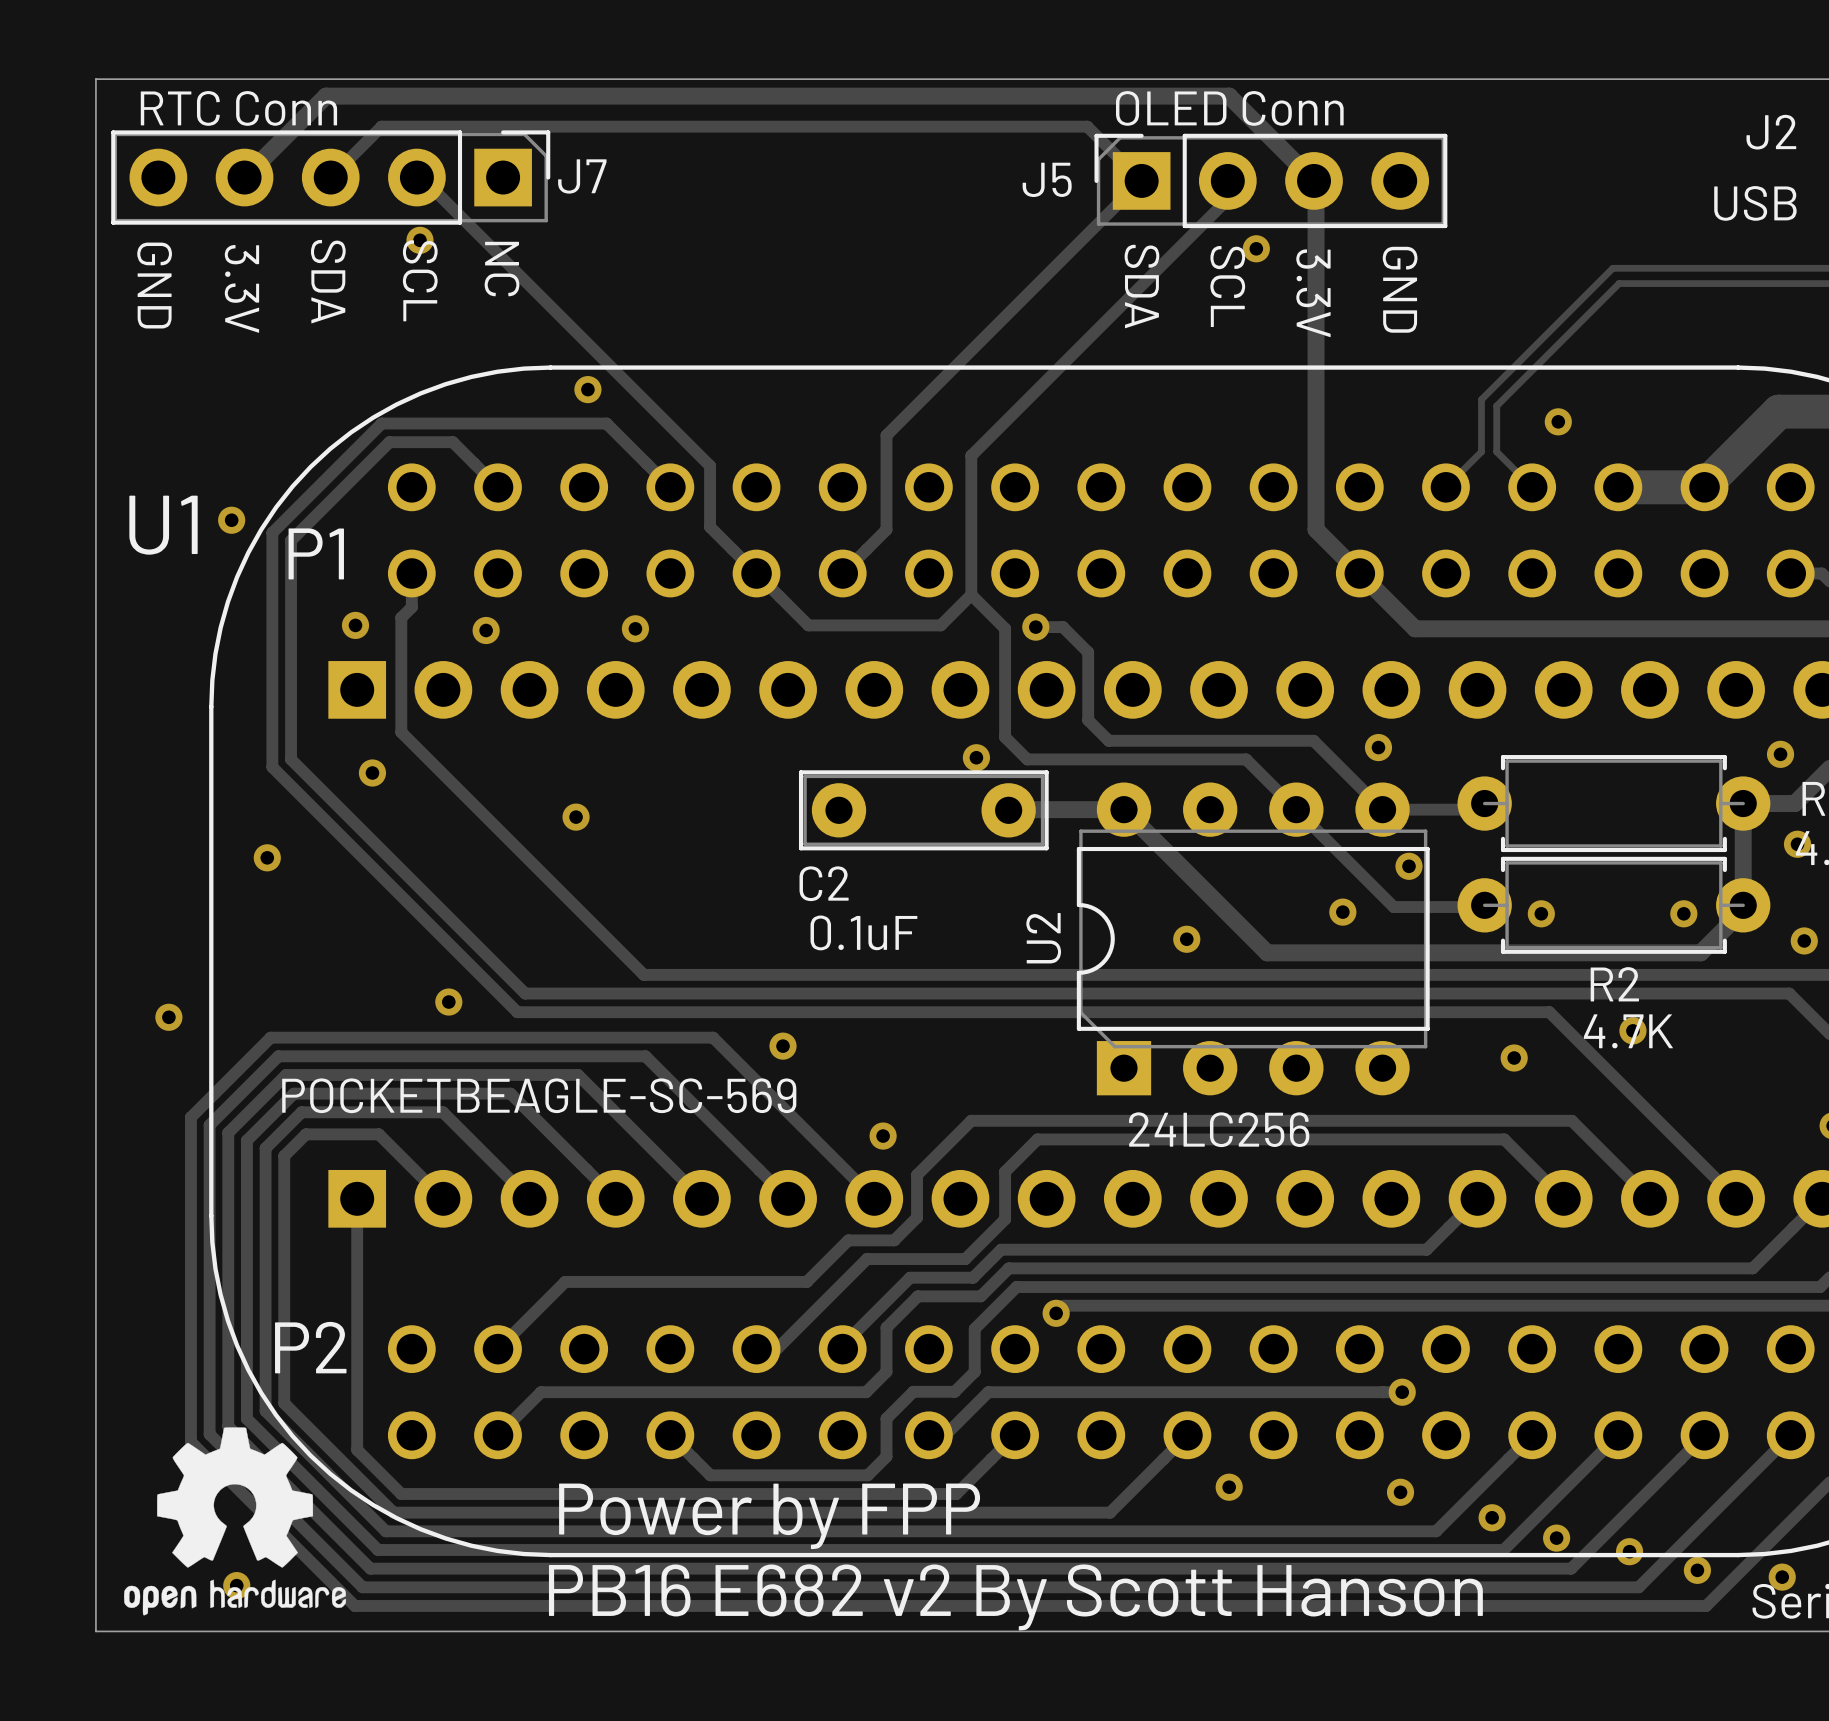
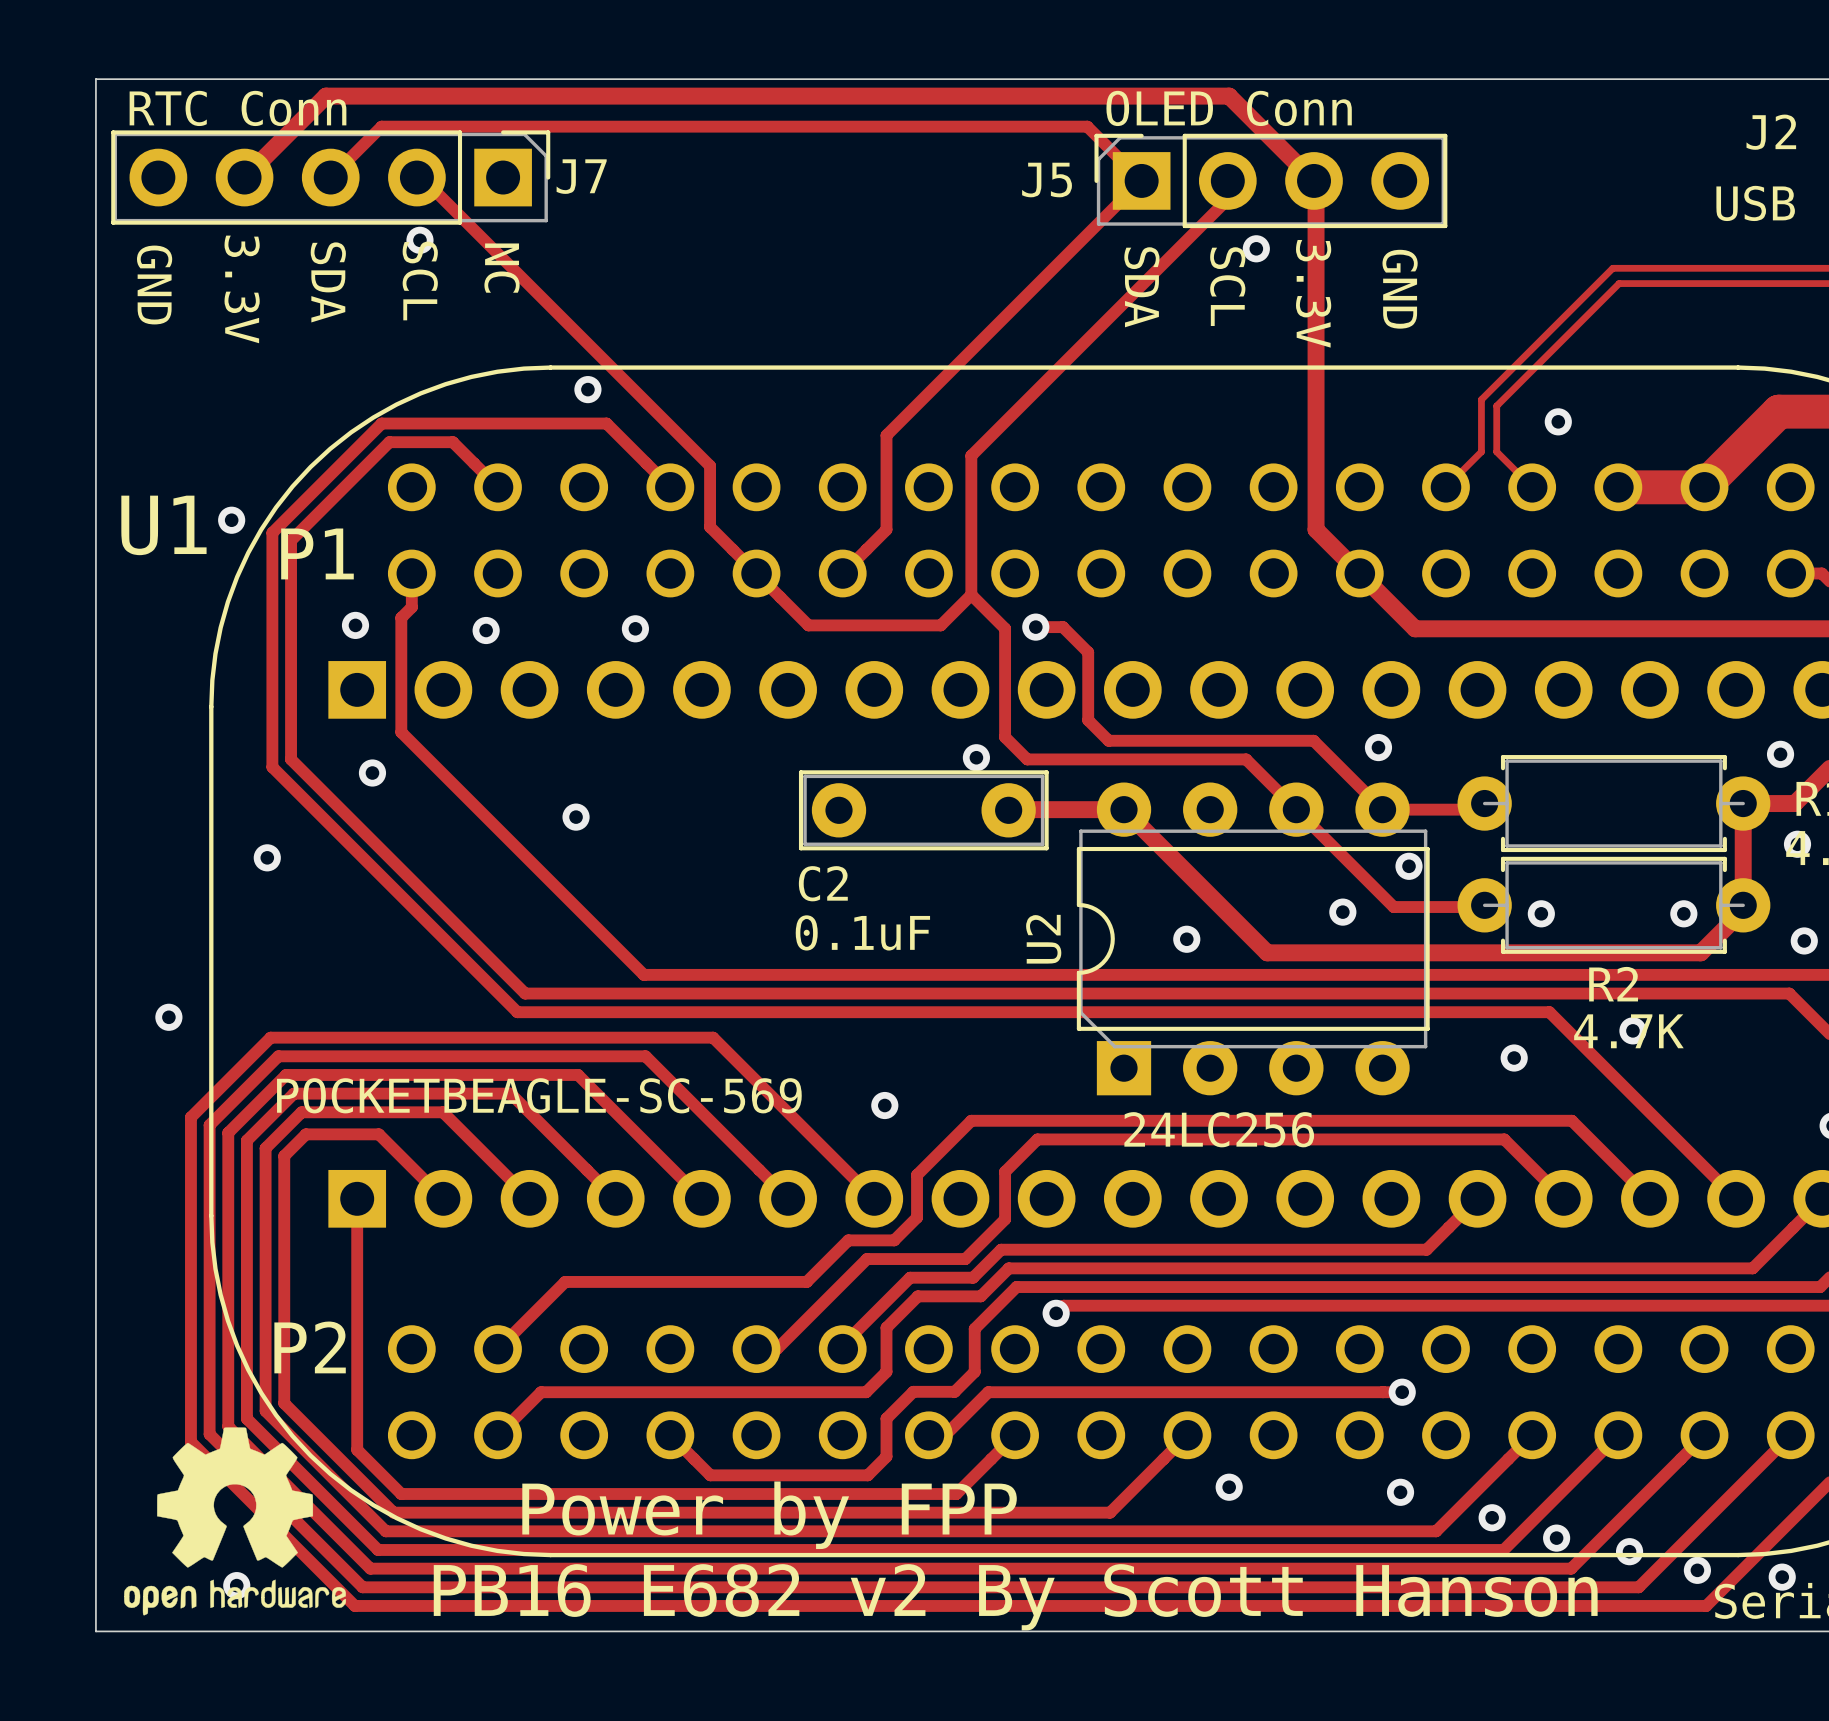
via: (448, 1002) -> none
via: (783, 1046) -> none
via position: (883, 1136) -> (884, 1105)

